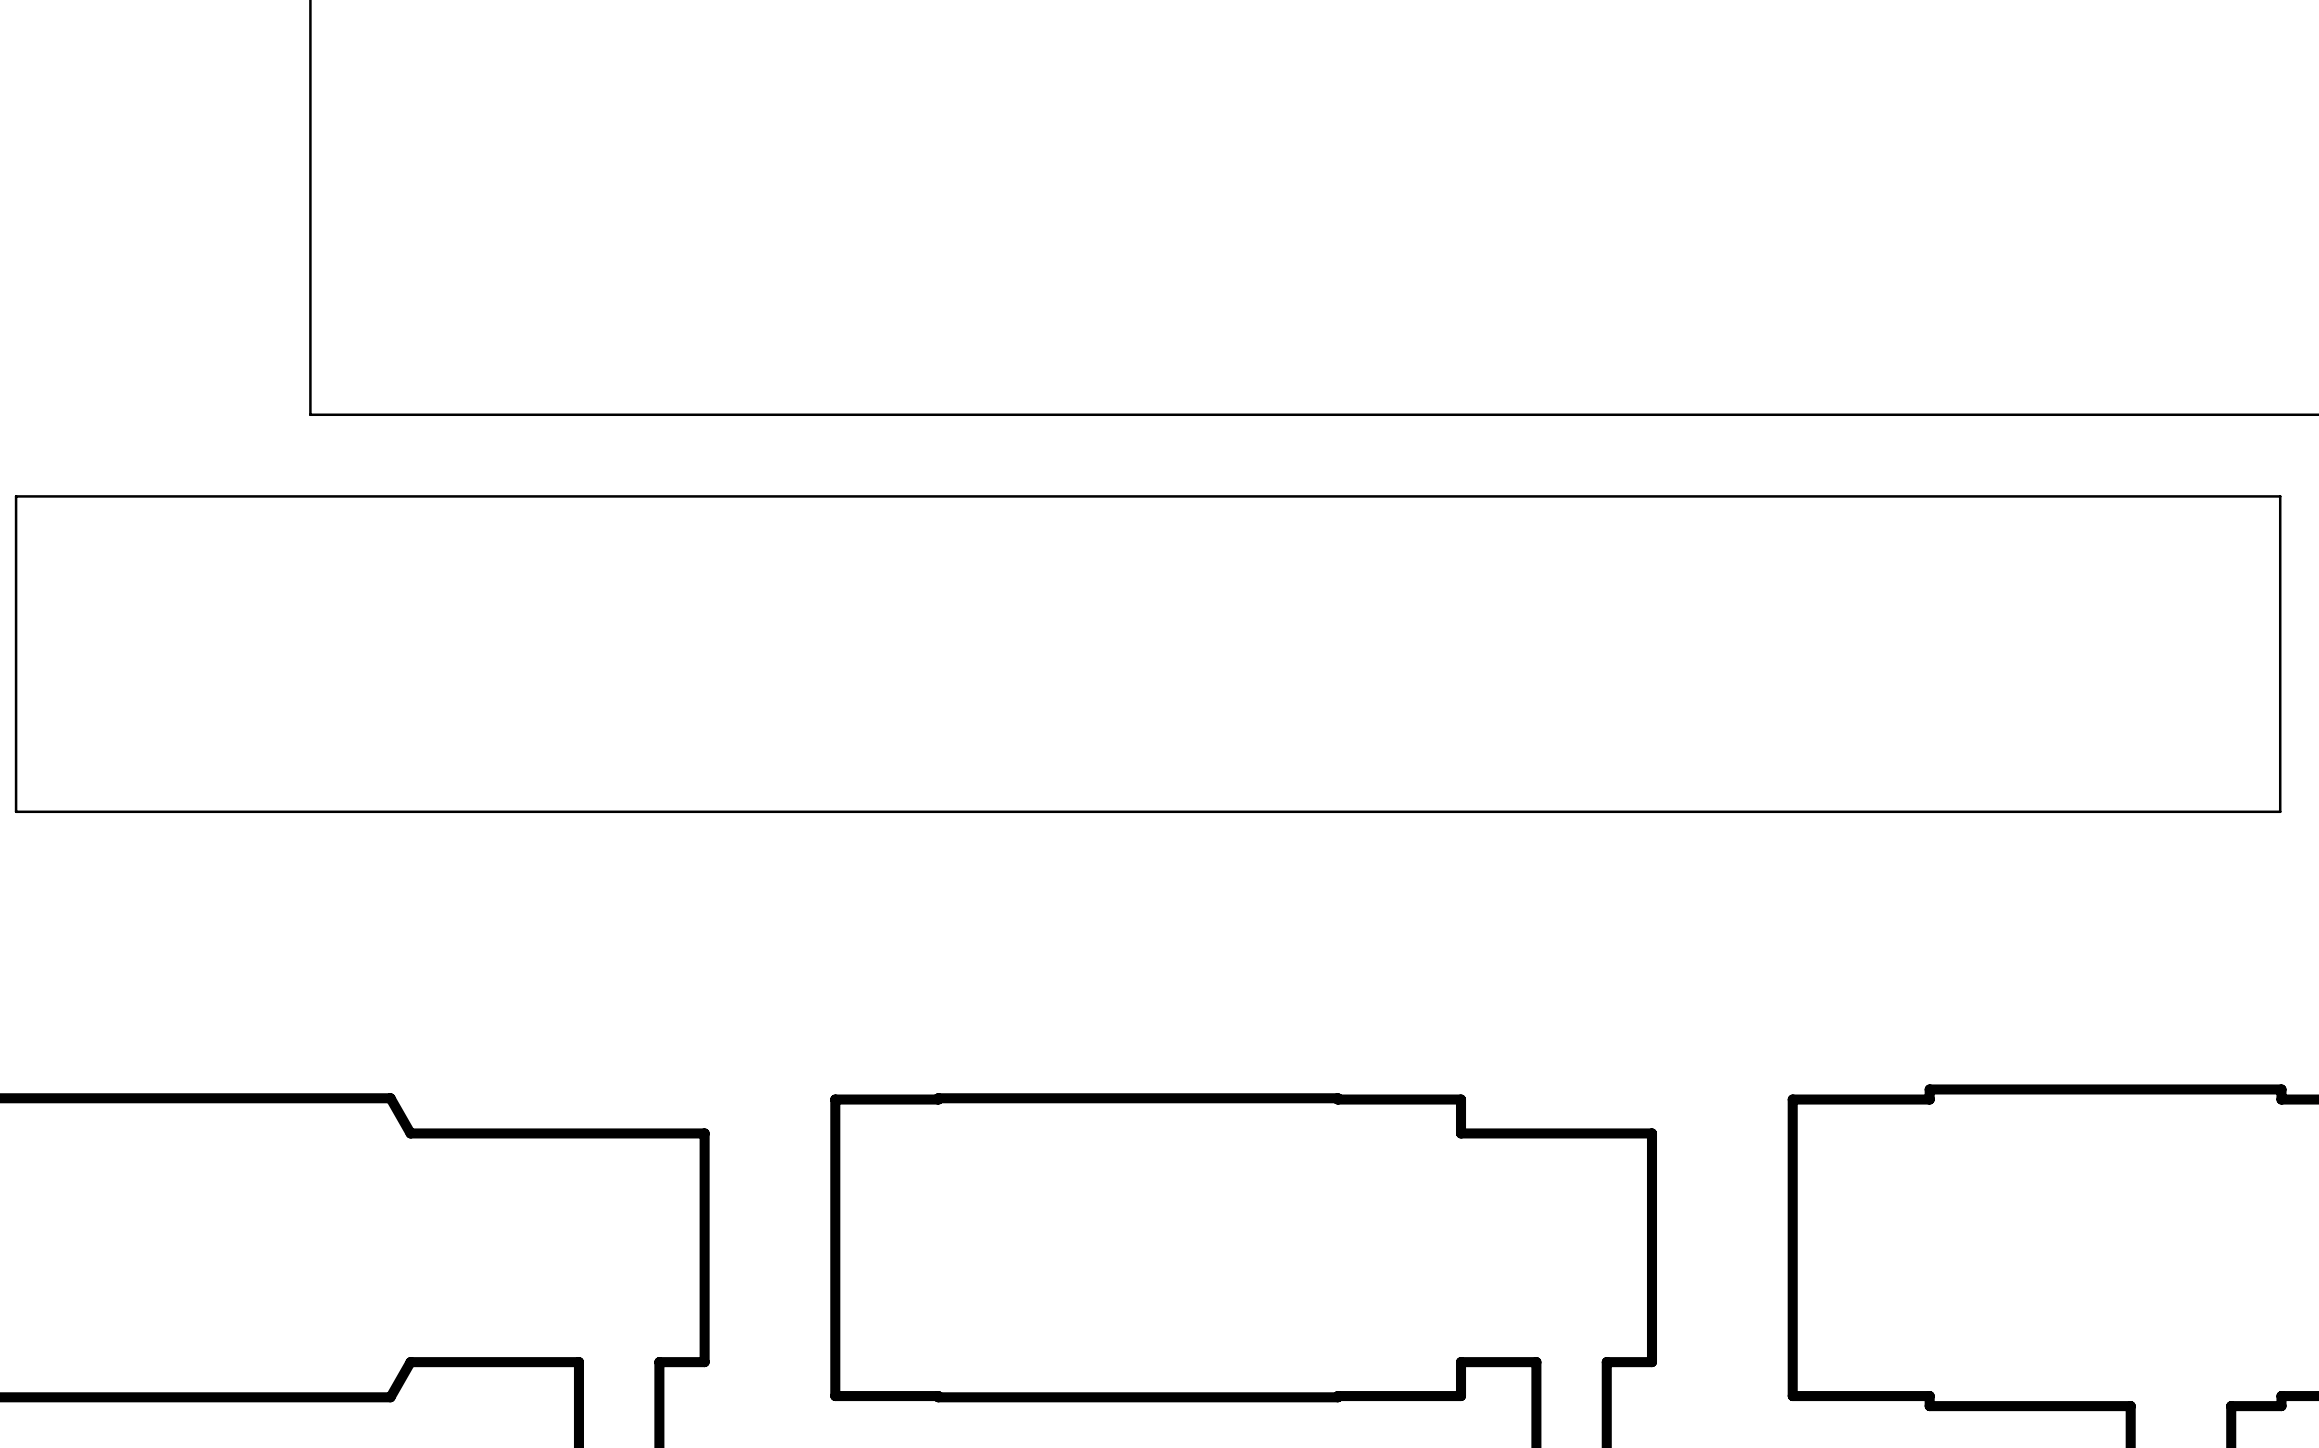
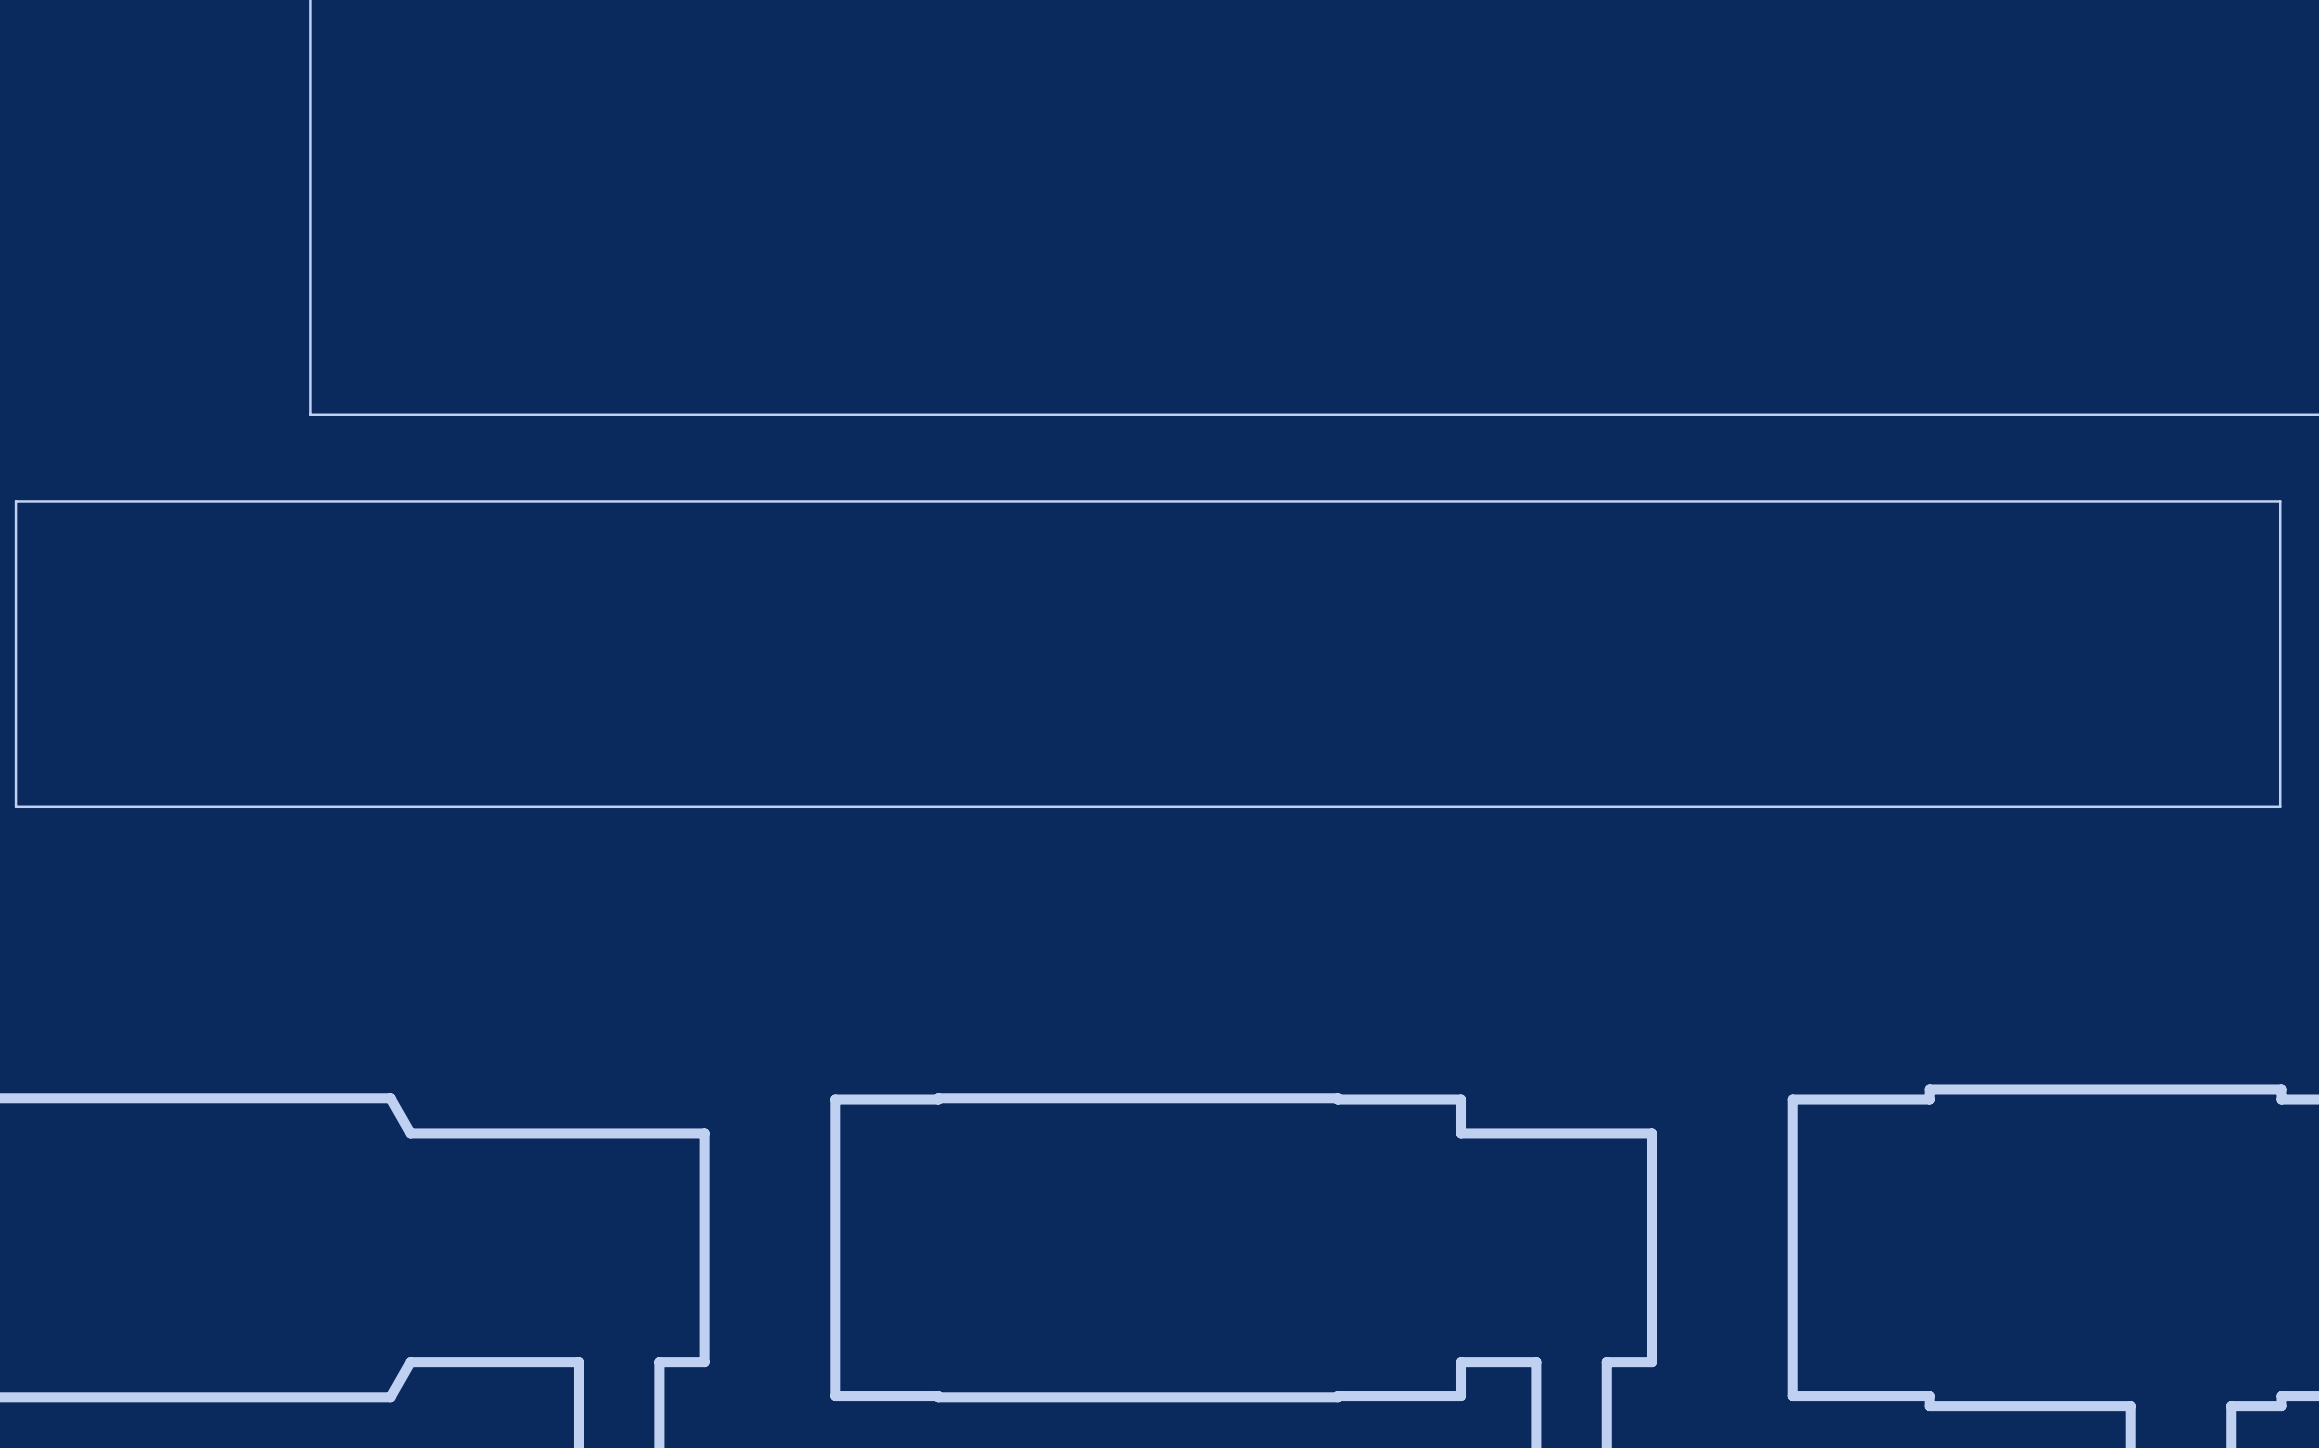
drawing shape: [14, 495, 2282, 814] -> [14, 500, 2282, 809]

